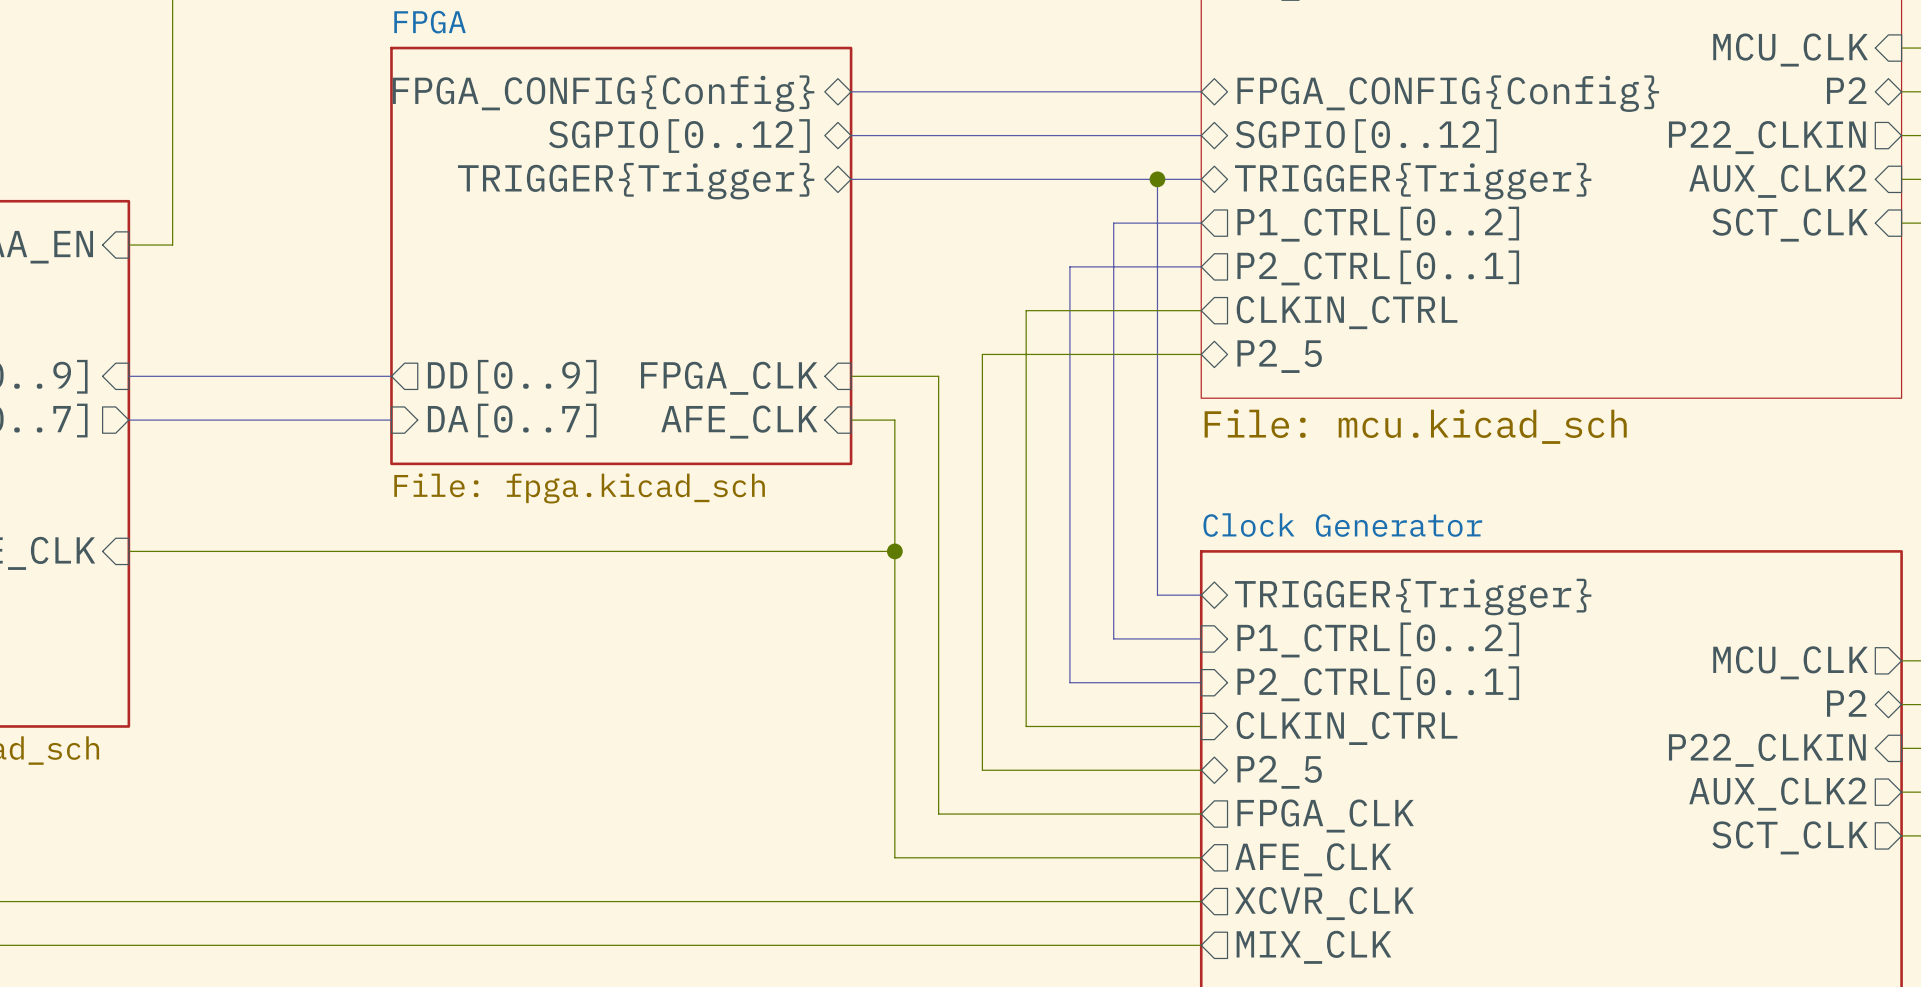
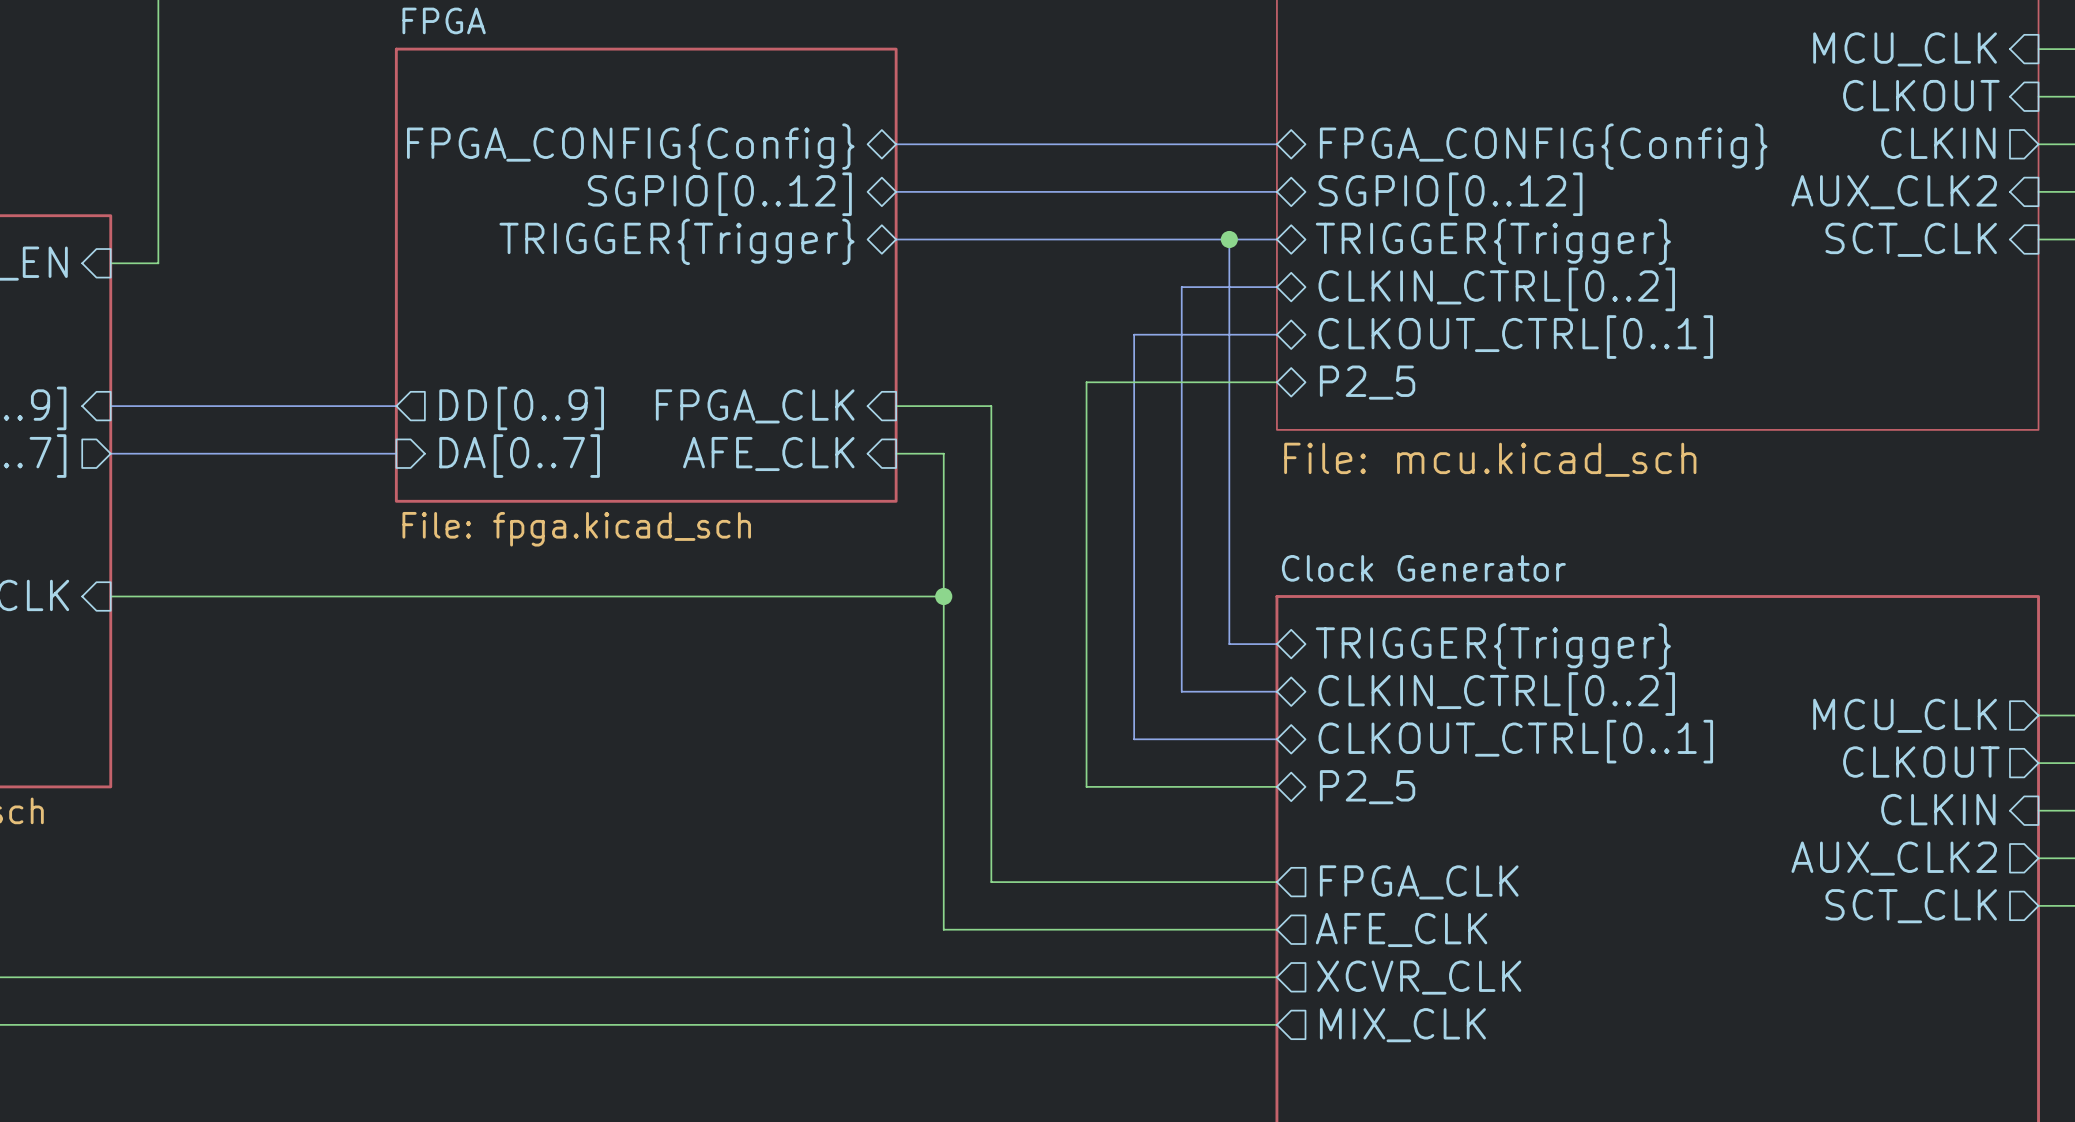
sheet pin shape: bidirectional (1846, 90) -> input (1921, 95)
sheet pin: P2 (1846, 90) -> CLKOUT (1921, 95)
bus: (851, 91) (1201, 91) -> none
sheet pin: FPGA_CONFIG{Config} (603, 93) -> none
sheet pin: FPGA_CONFIG{Config} (1448, 93) -> none
sheet pin: SGPIO[0..12] (679, 136) -> FPGA_CONFIG{Config} (630, 146)
sheet pin: SGPIO[0..12] (1366, 136) -> FPGA_CONFIG{Config} (1543, 146)
sheet pin: P22_CLKIN (1767, 137) -> CLKIN (1938, 143)
bus: (1157, 179) (1157, 223) -> none
junction position: (1157, 179) -> (1229, 239)
sheet pin: TRIGGER{Trigger} (636, 181) -> SGPIO[0..12] (719, 194)
sheet pin: TRIGGER{Trigger} (1413, 181) -> SGPIO[0..12] (1450, 194)
bus: none -> (896, 239) (1181, 239)
bus: (1113, 223) (1113, 266) (1069, 266) (1069, 310) -> (1276, 334) (1134, 334)
sheet pin: none -> TRIGGER{Trigger} (677, 241)
sheet pin shape: output (1378, 224) -> bidirectional (1493, 241)
sheet pin: P1_CTRL[0..2] (1378, 224) -> TRIGGER{Trigger} (1493, 241)
sheet pin shape: output (1378, 267) -> bidirectional (1496, 289)
sheet pin: P2_CTRL[0..1] (1378, 267) -> CLKIN_CTRL[0..2] (1496, 289)
wire: (1201, 310) (1026, 310) (1026, 354) (982, 354) (982, 770) (1201, 770) -> none
sheet pin shape: output (1347, 312) -> bidirectional (1515, 337)
sheet pin: CLKIN_CTRL (1347, 312) -> CLKOUT_CTRL[0..1] (1515, 337)
sheet pin shape: input (1378, 639) -> bidirectional (1496, 694)
sheet pin: P1_CTRL[0..2] (1378, 639) -> CLKIN_CTRL[0..2] (1496, 694)
sheet pin shape: input (1378, 683) -> bidirectional (1515, 741)
sheet pin: P2_CTRL[0..1] (1378, 683) -> CLKOUT_CTRL[0..1] (1515, 741)
sheet pin shape: bidirectional (1846, 703) -> output (1921, 762)
sheet pin: P2 (1846, 703) -> CLKOUT (1921, 762)
sheet pin shape: input (1347, 728) -> bidirectional (1367, 787)
sheet pin: CLKIN_CTRL (1347, 728) -> P2_5 (1367, 787)
sheet pin: P22_CLKIN (1767, 750) -> CLKIN (1938, 809)
sheet pin: P2_5 (1279, 772) -> none

